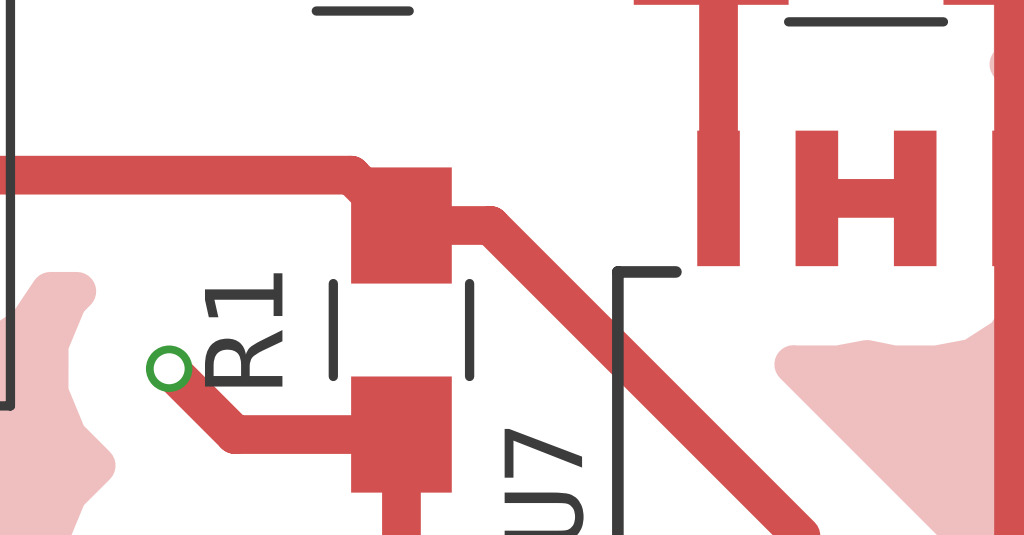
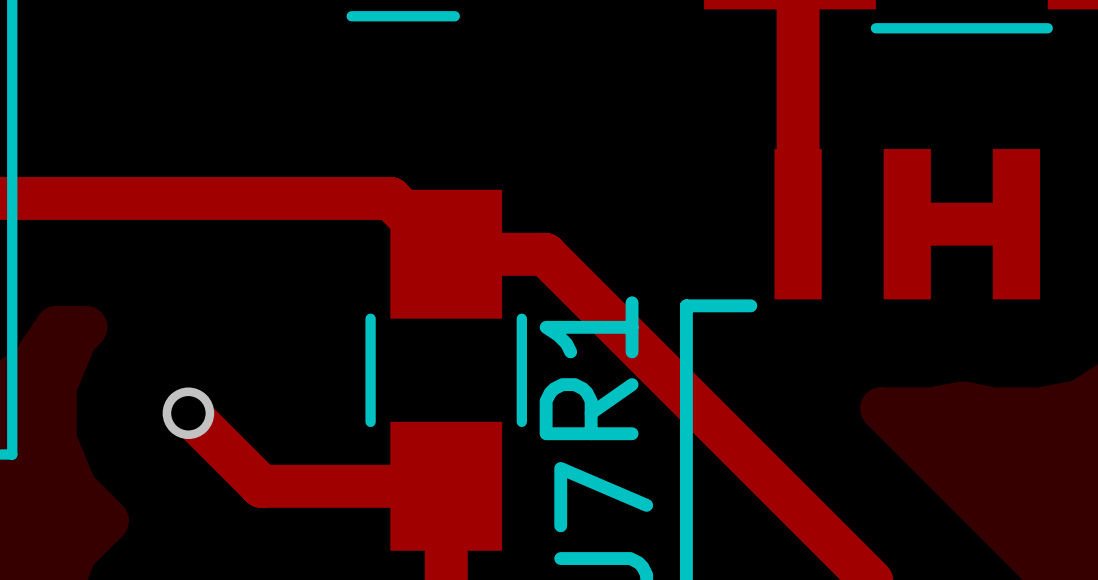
R1 name position: R1 (243, 329) -> R1 (589, 368)

